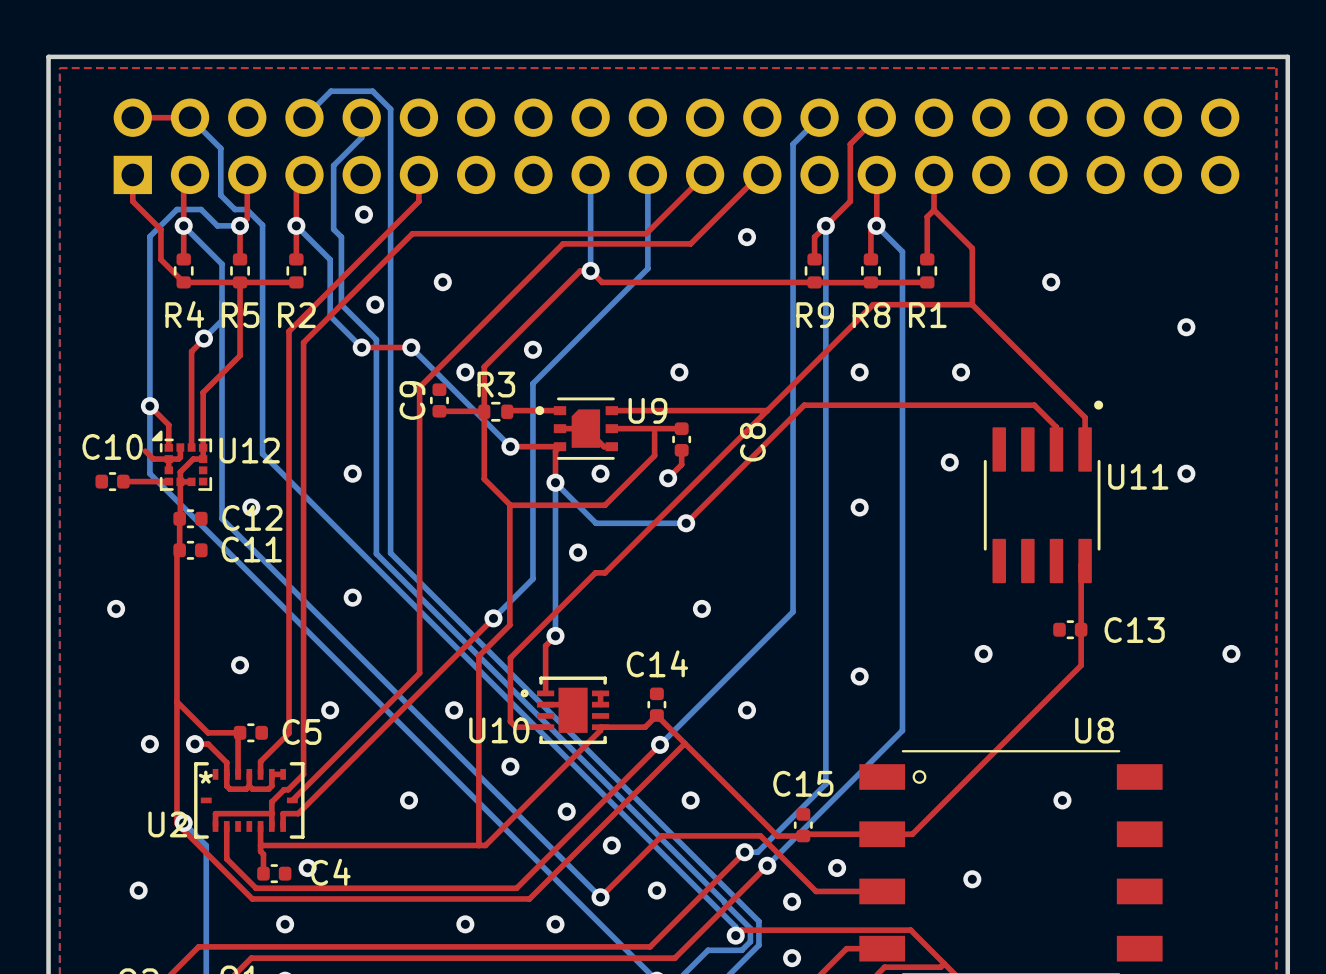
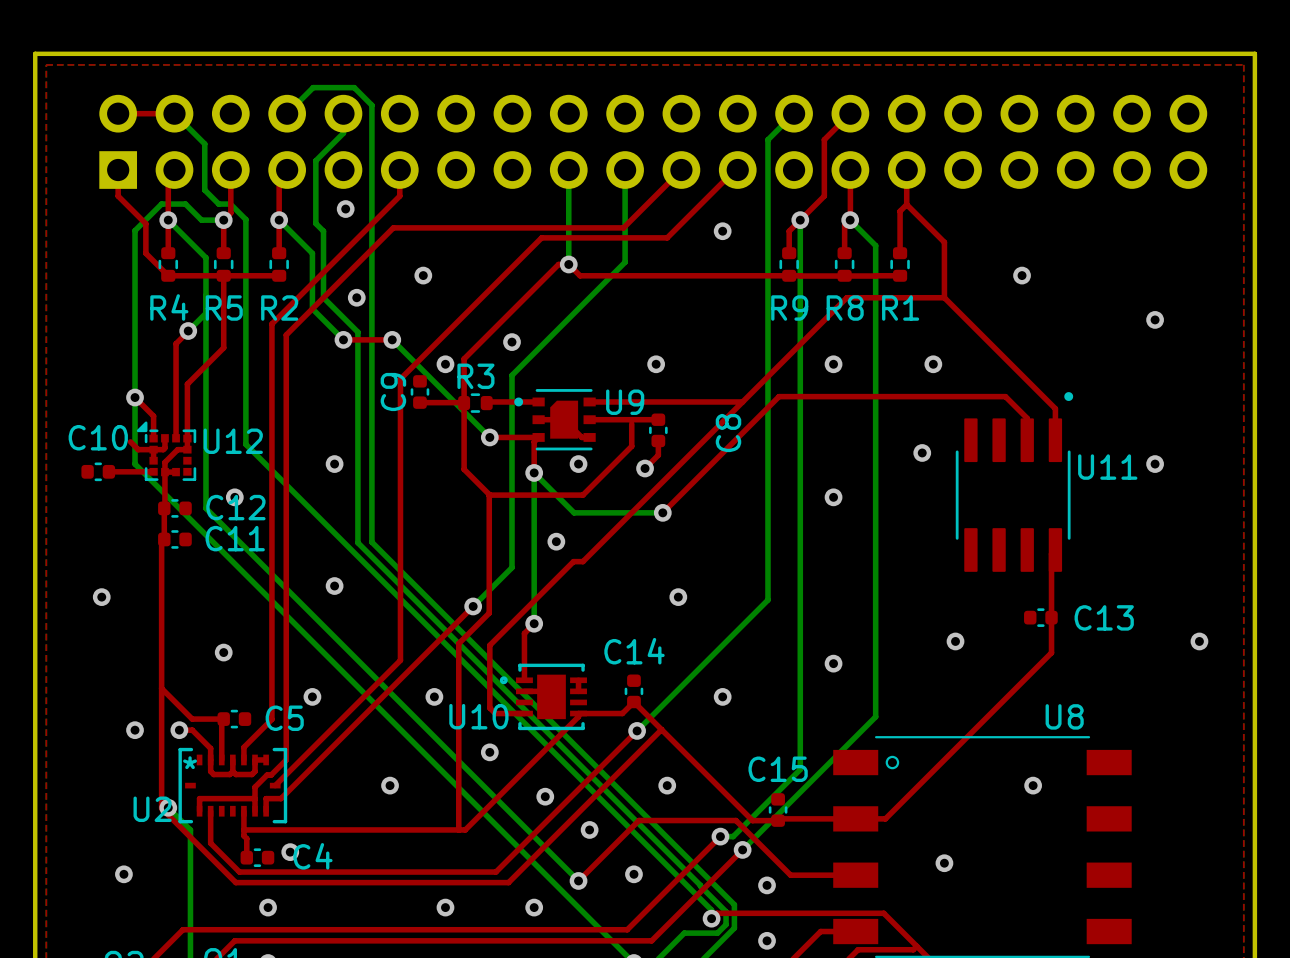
via: (837, 868) -> none

